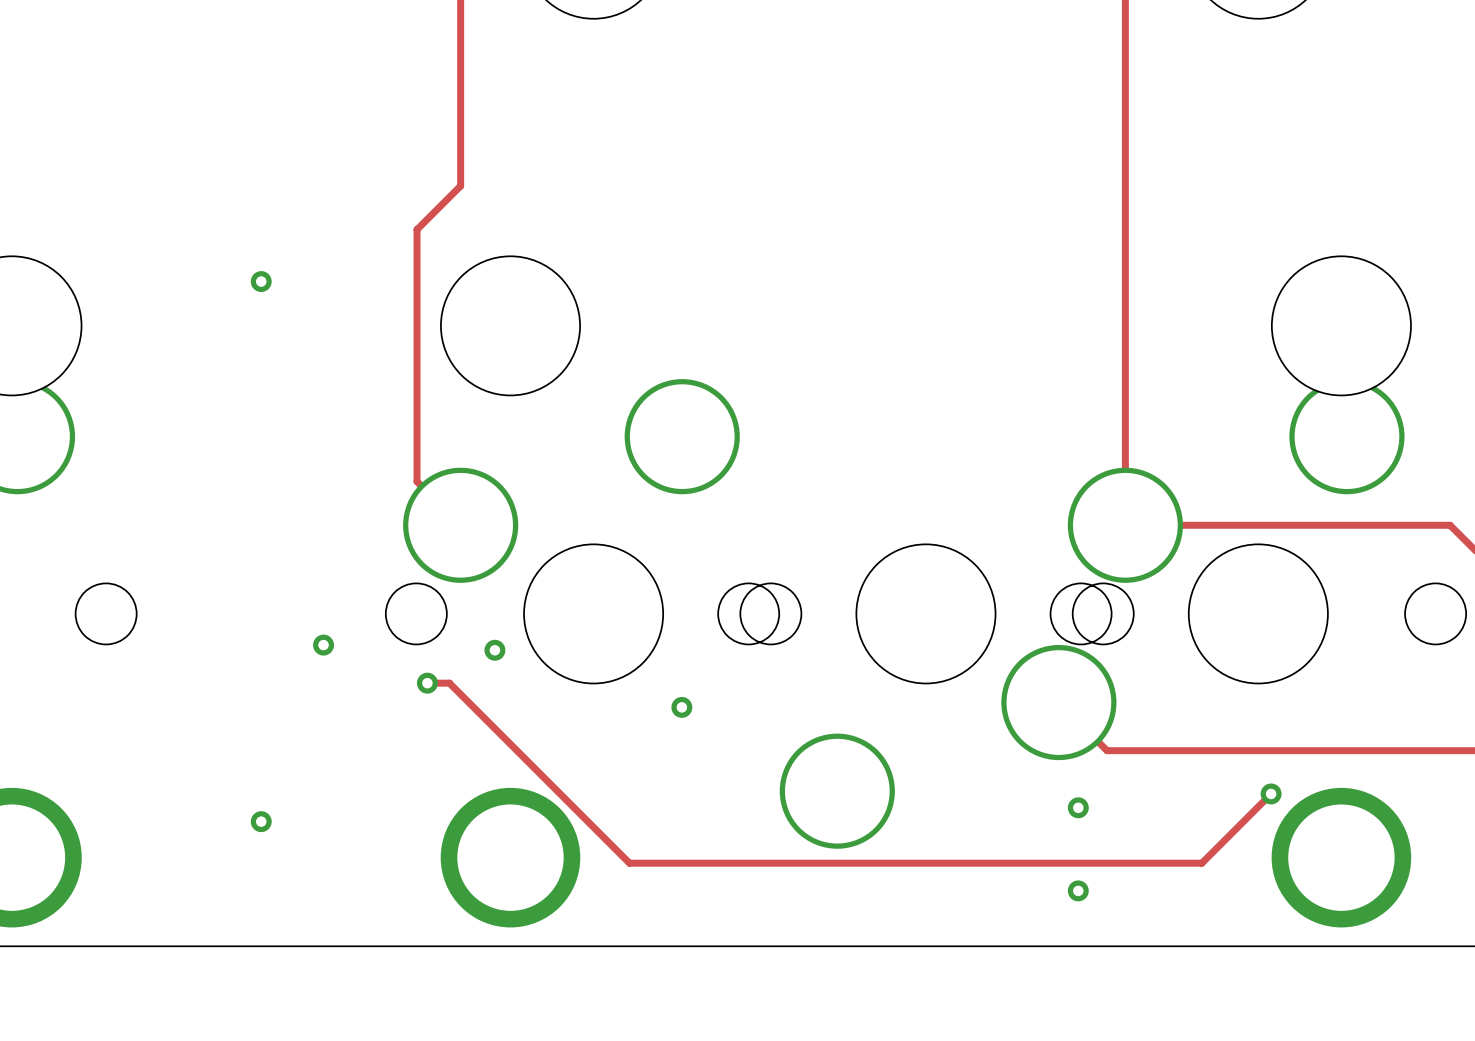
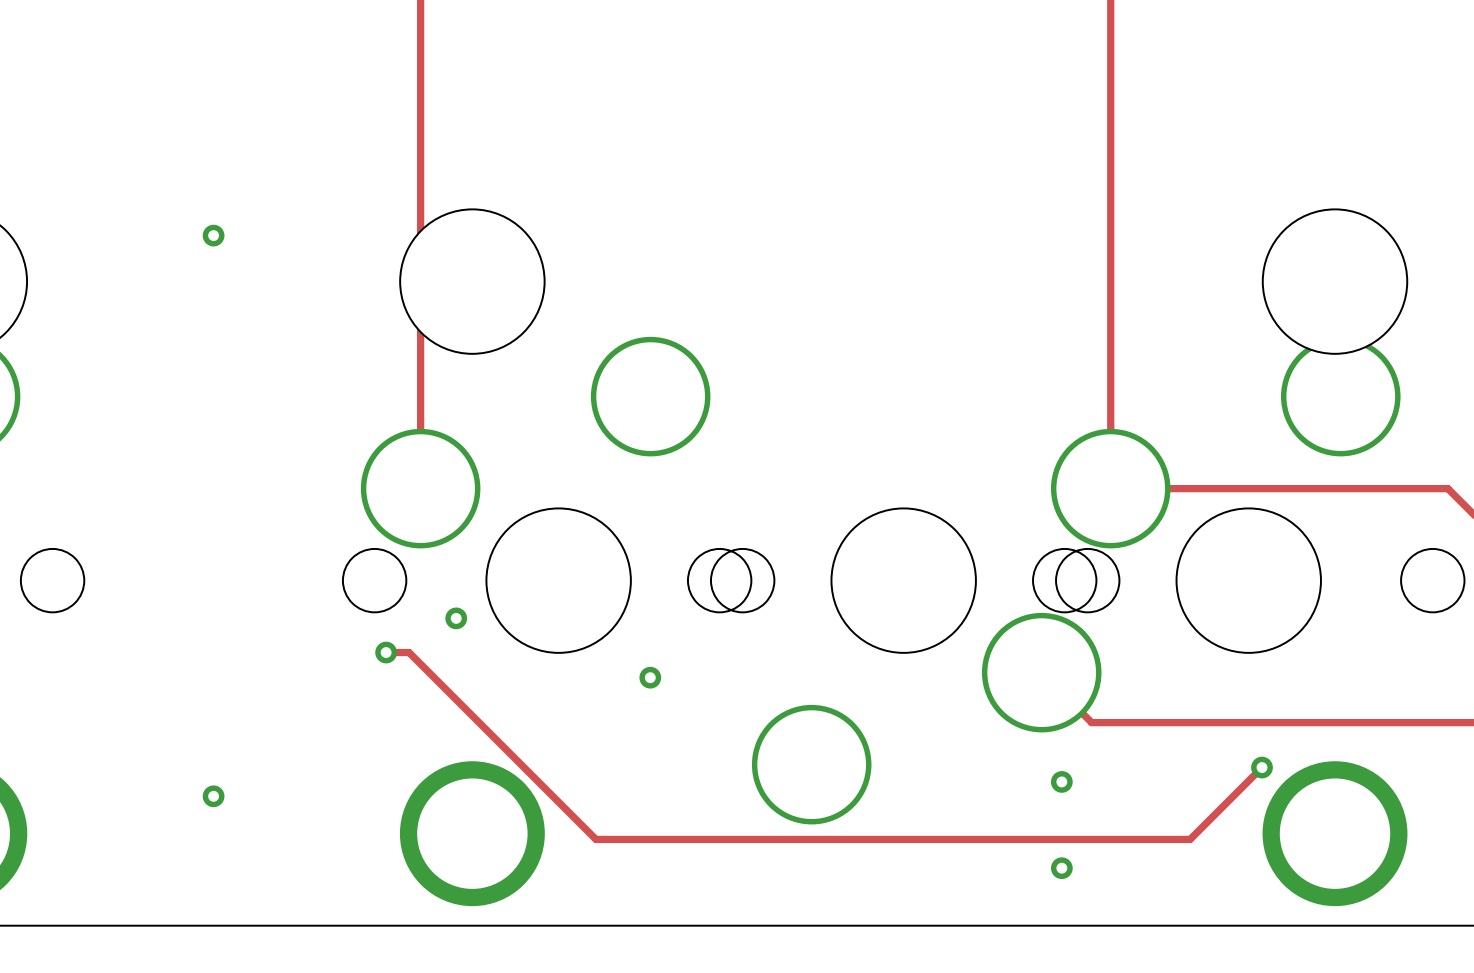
track: (460, 185) (417, 229) (417, 481) (460, 525) -> (420, 136) (420, 488)
via: (323, 645) -> none

